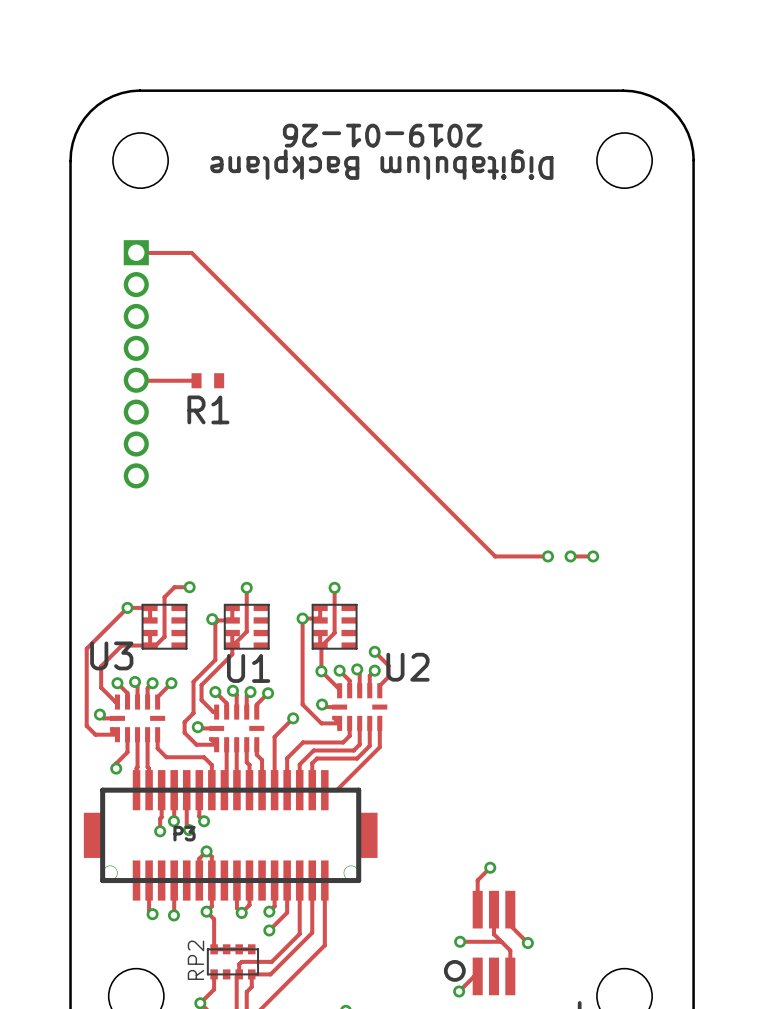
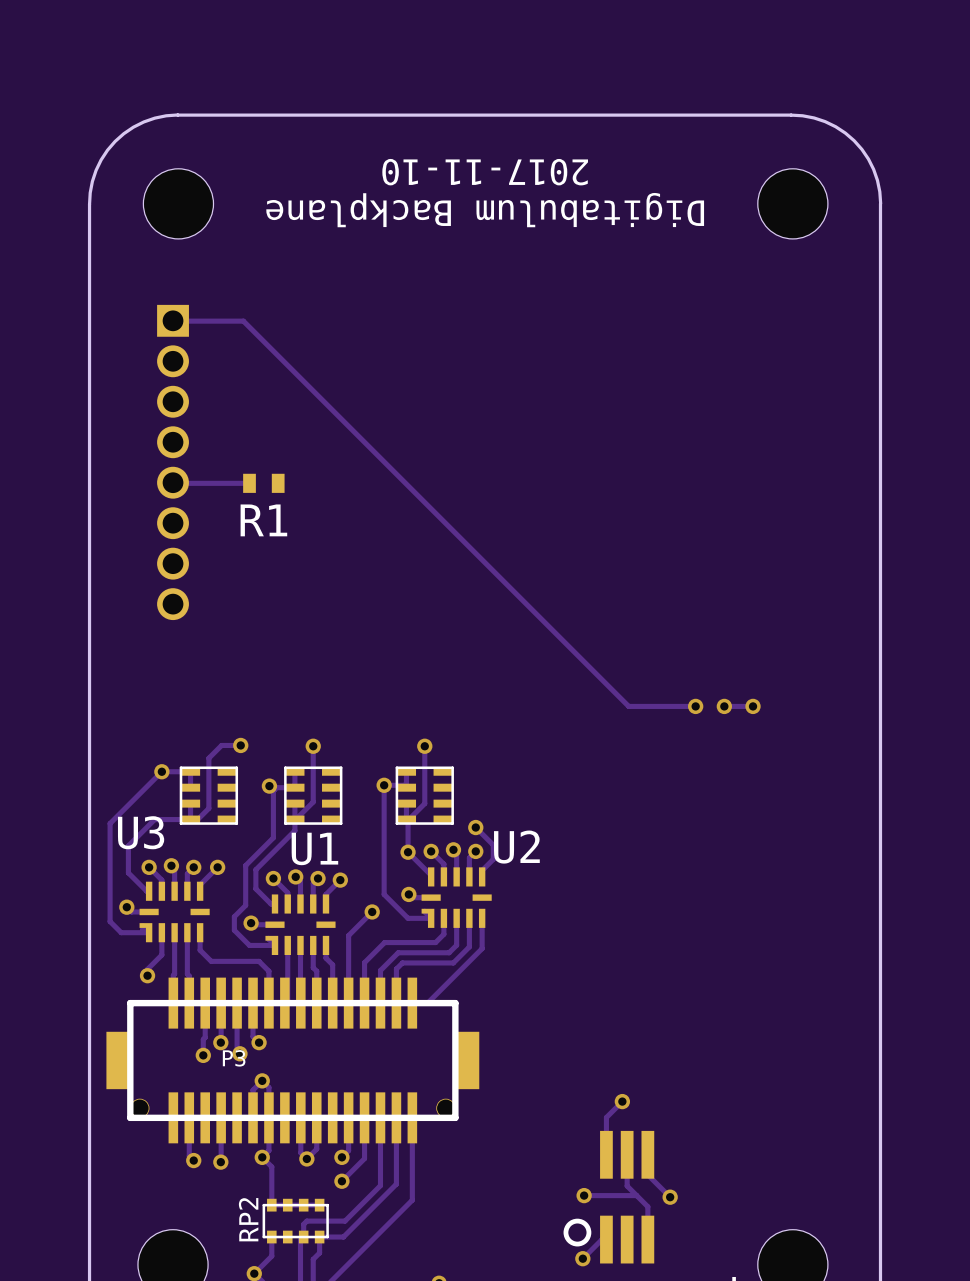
text: 2019-01-26 (382, 135) -> 2017-11-10 (485, 172)

